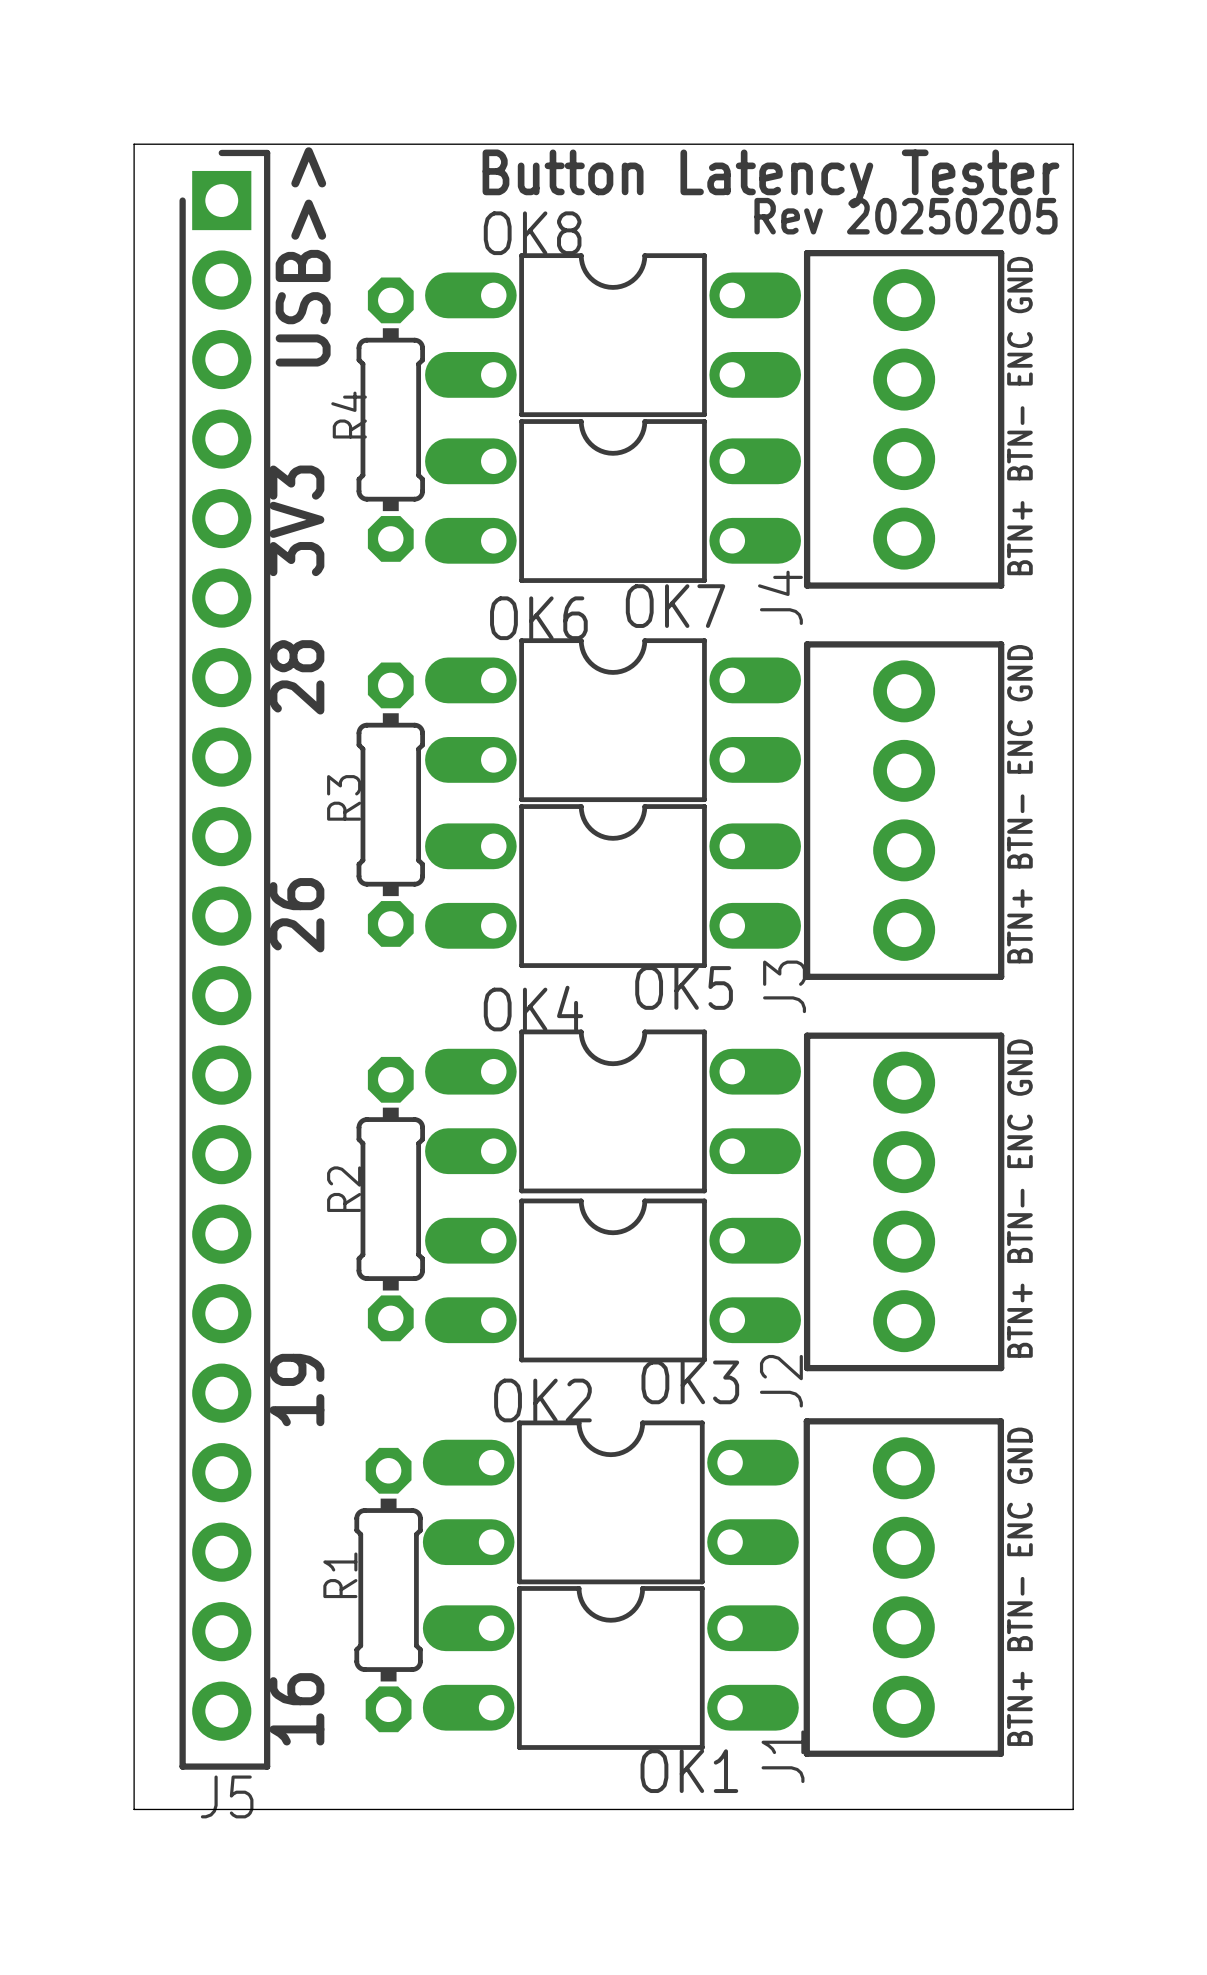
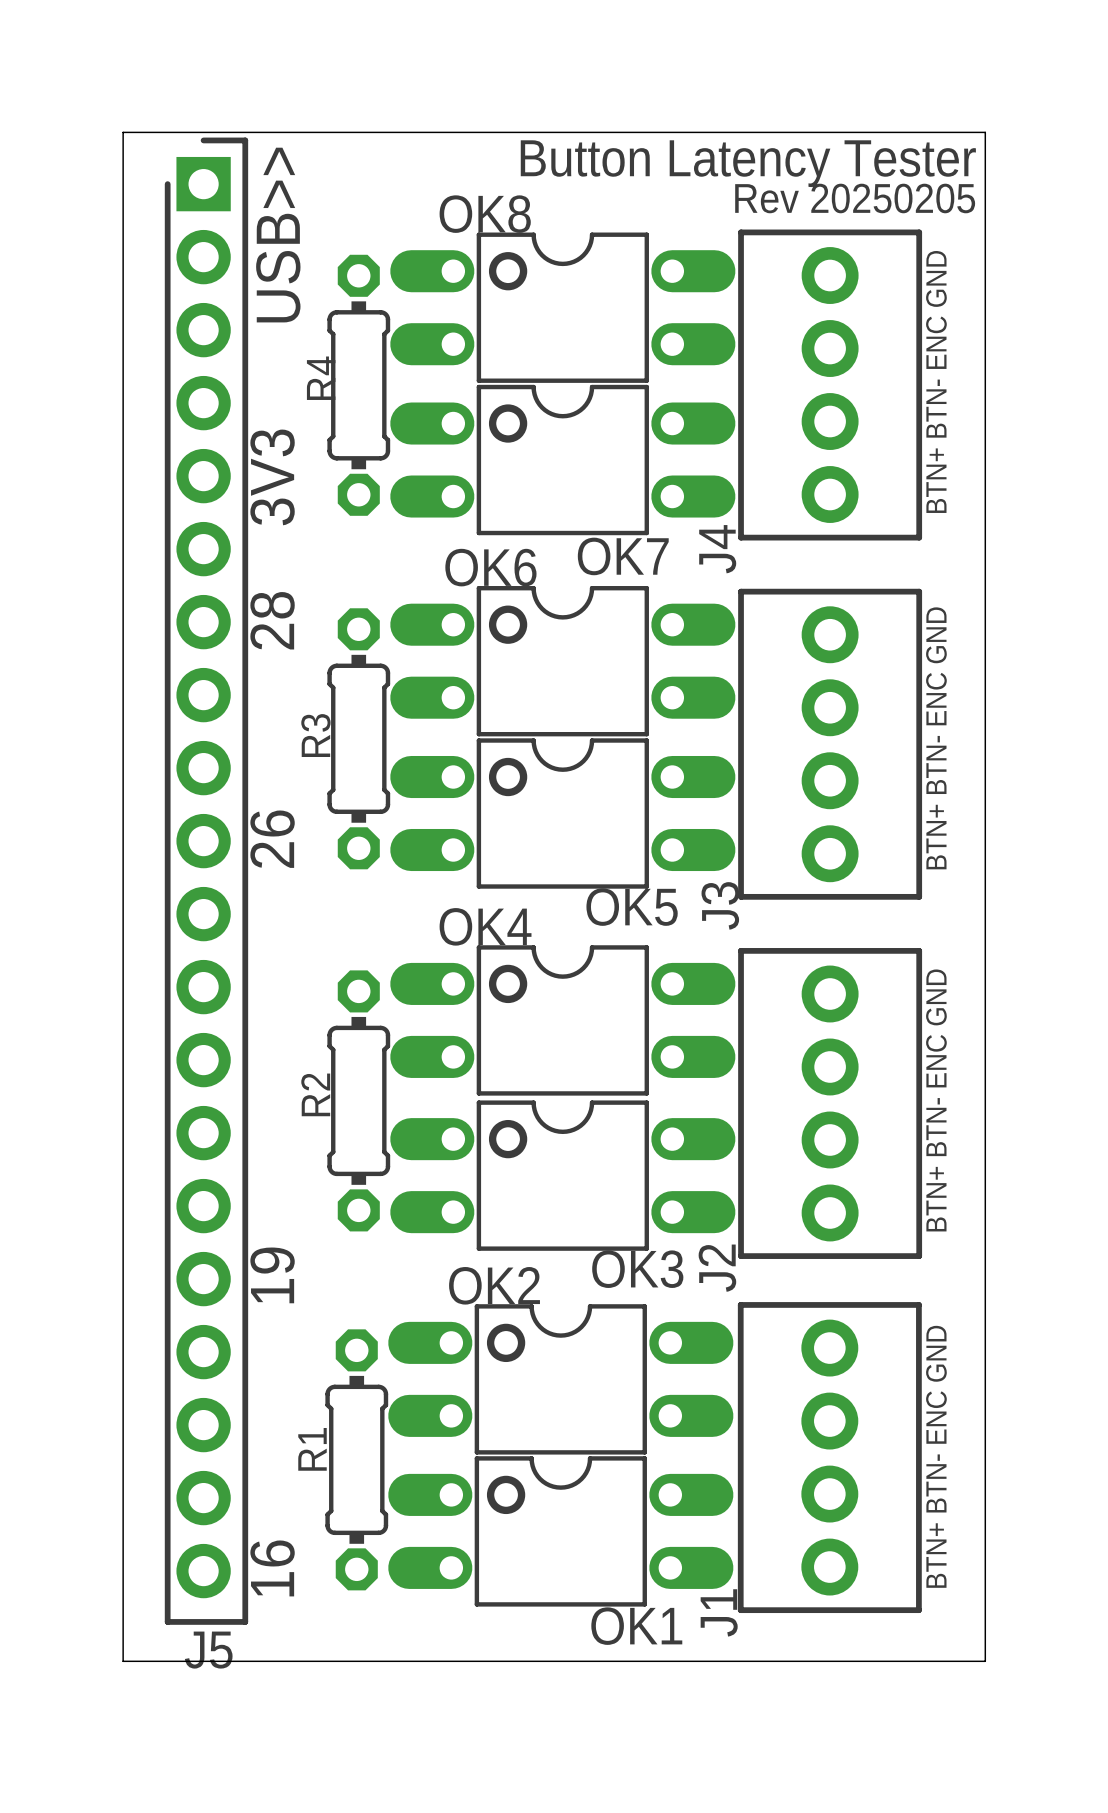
OK8 footprint: [425, 253, 801, 418] -> [390, 232, 736, 383]
OK7 footprint: [425, 419, 801, 583] -> [390, 384, 736, 536]
OK6 footprint: [425, 638, 801, 803] -> [390, 586, 736, 737]
OK5 footprint: [425, 804, 801, 968] -> [390, 738, 736, 889]
OK4 footprint: [425, 1029, 801, 1194] -> [390, 945, 736, 1096]
OK3 footprint: [425, 1198, 801, 1363] -> [390, 1100, 736, 1251]
OK2 footprint: [422, 1420, 799, 1585] -> [388, 1304, 734, 1455]
OK1 footprint: [422, 1586, 799, 1750] -> [388, 1456, 734, 1607]

